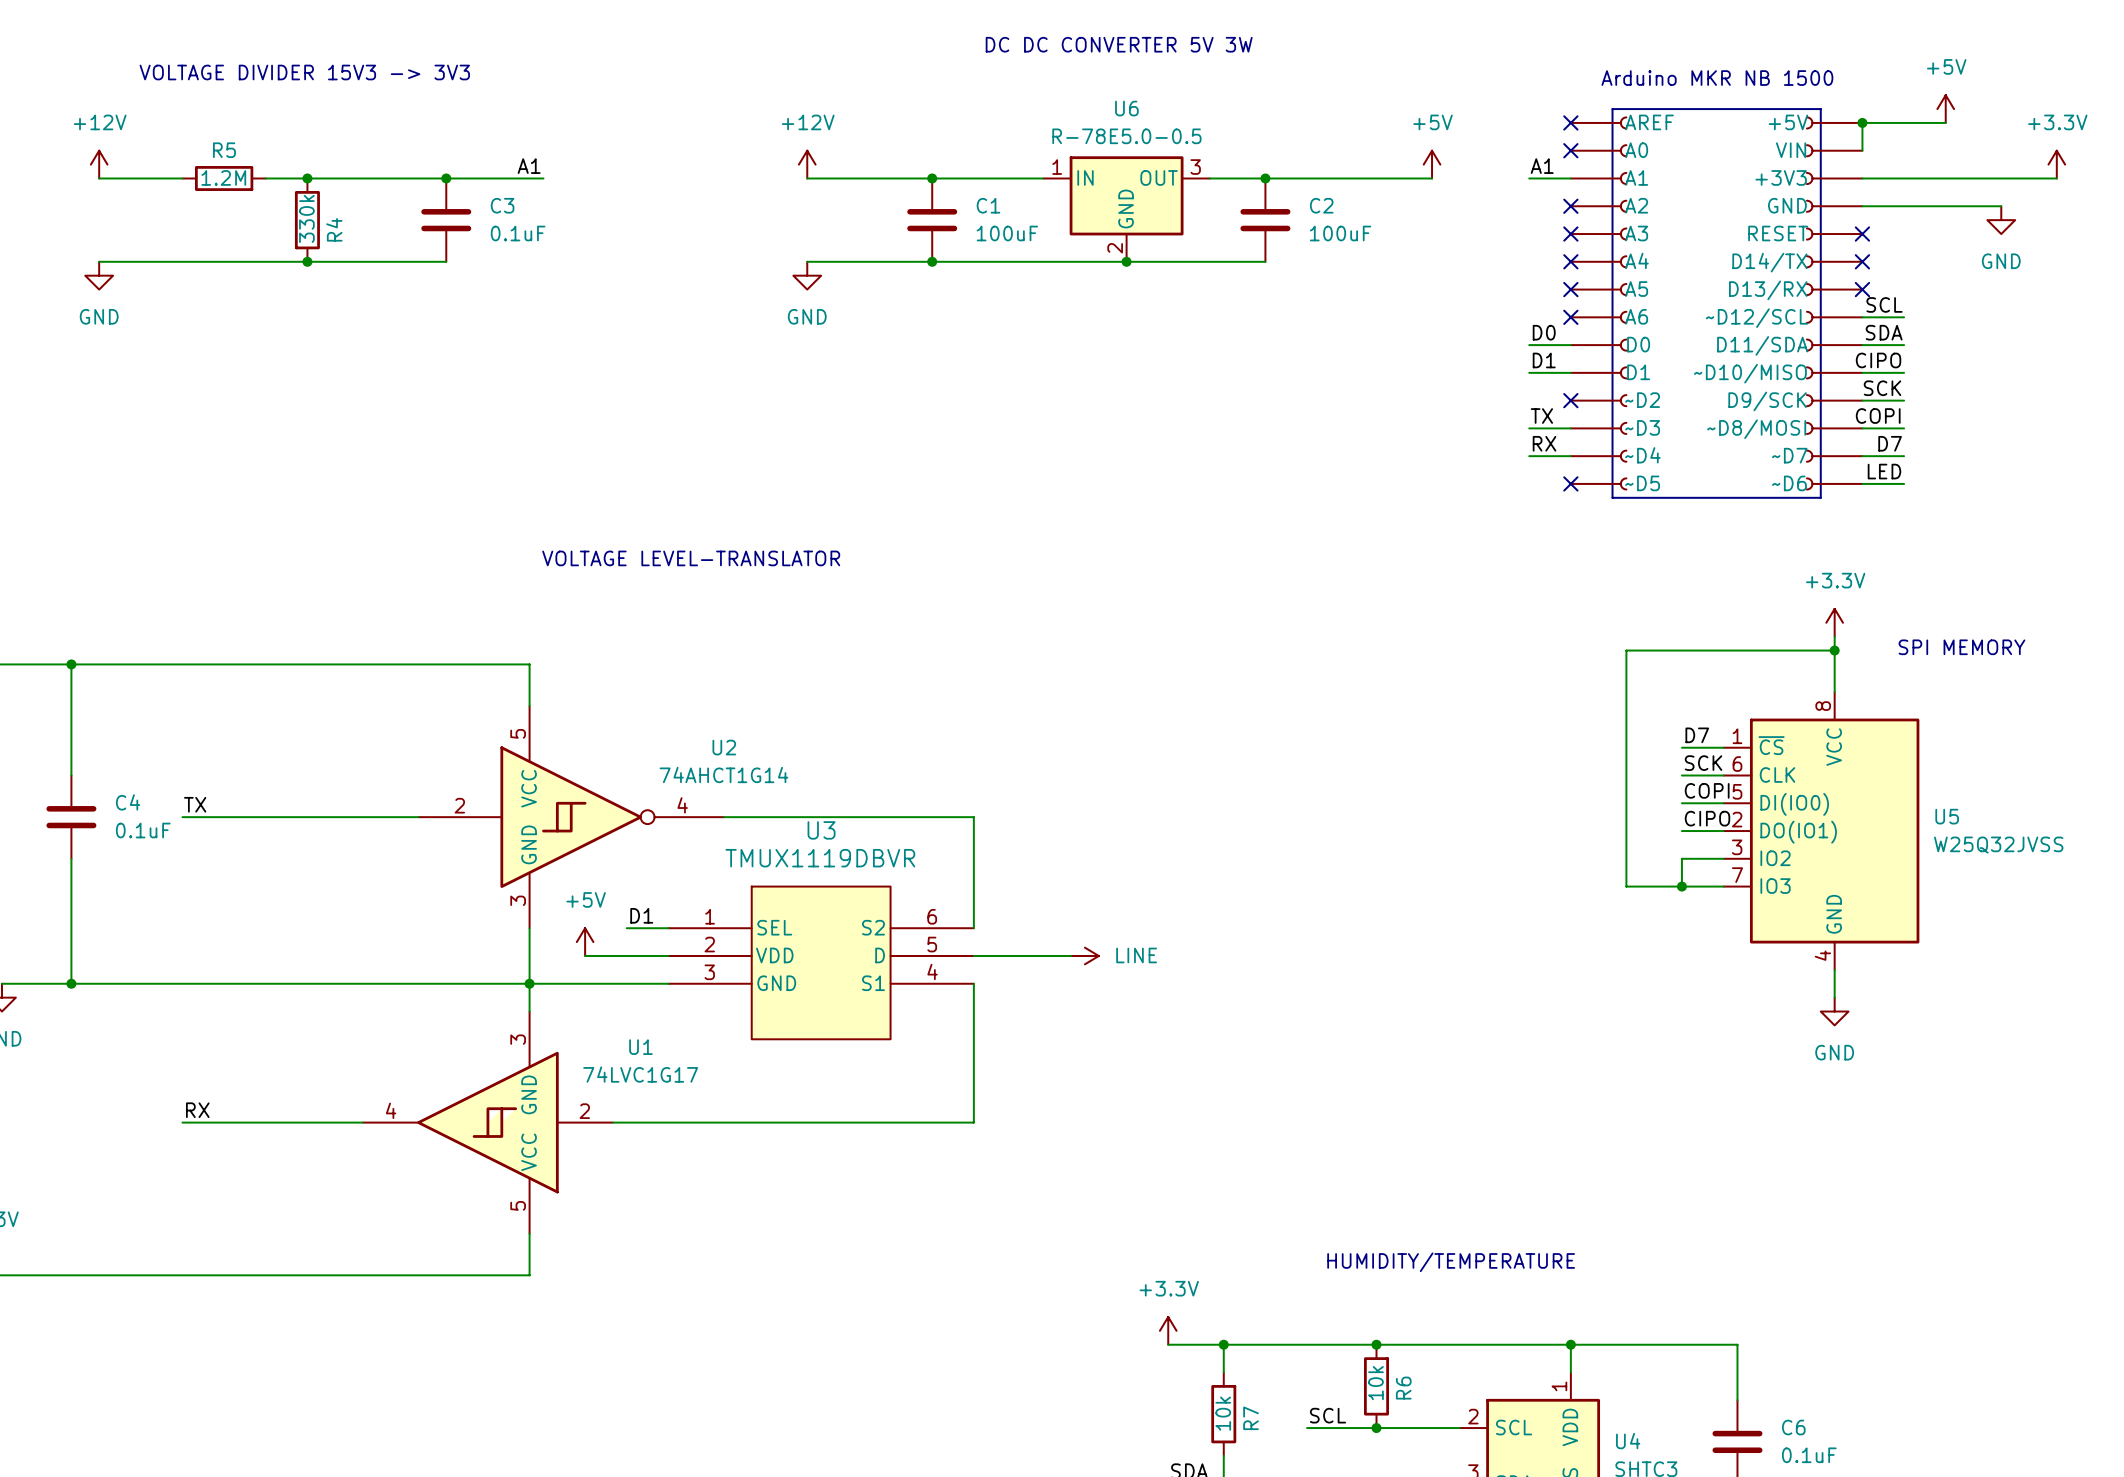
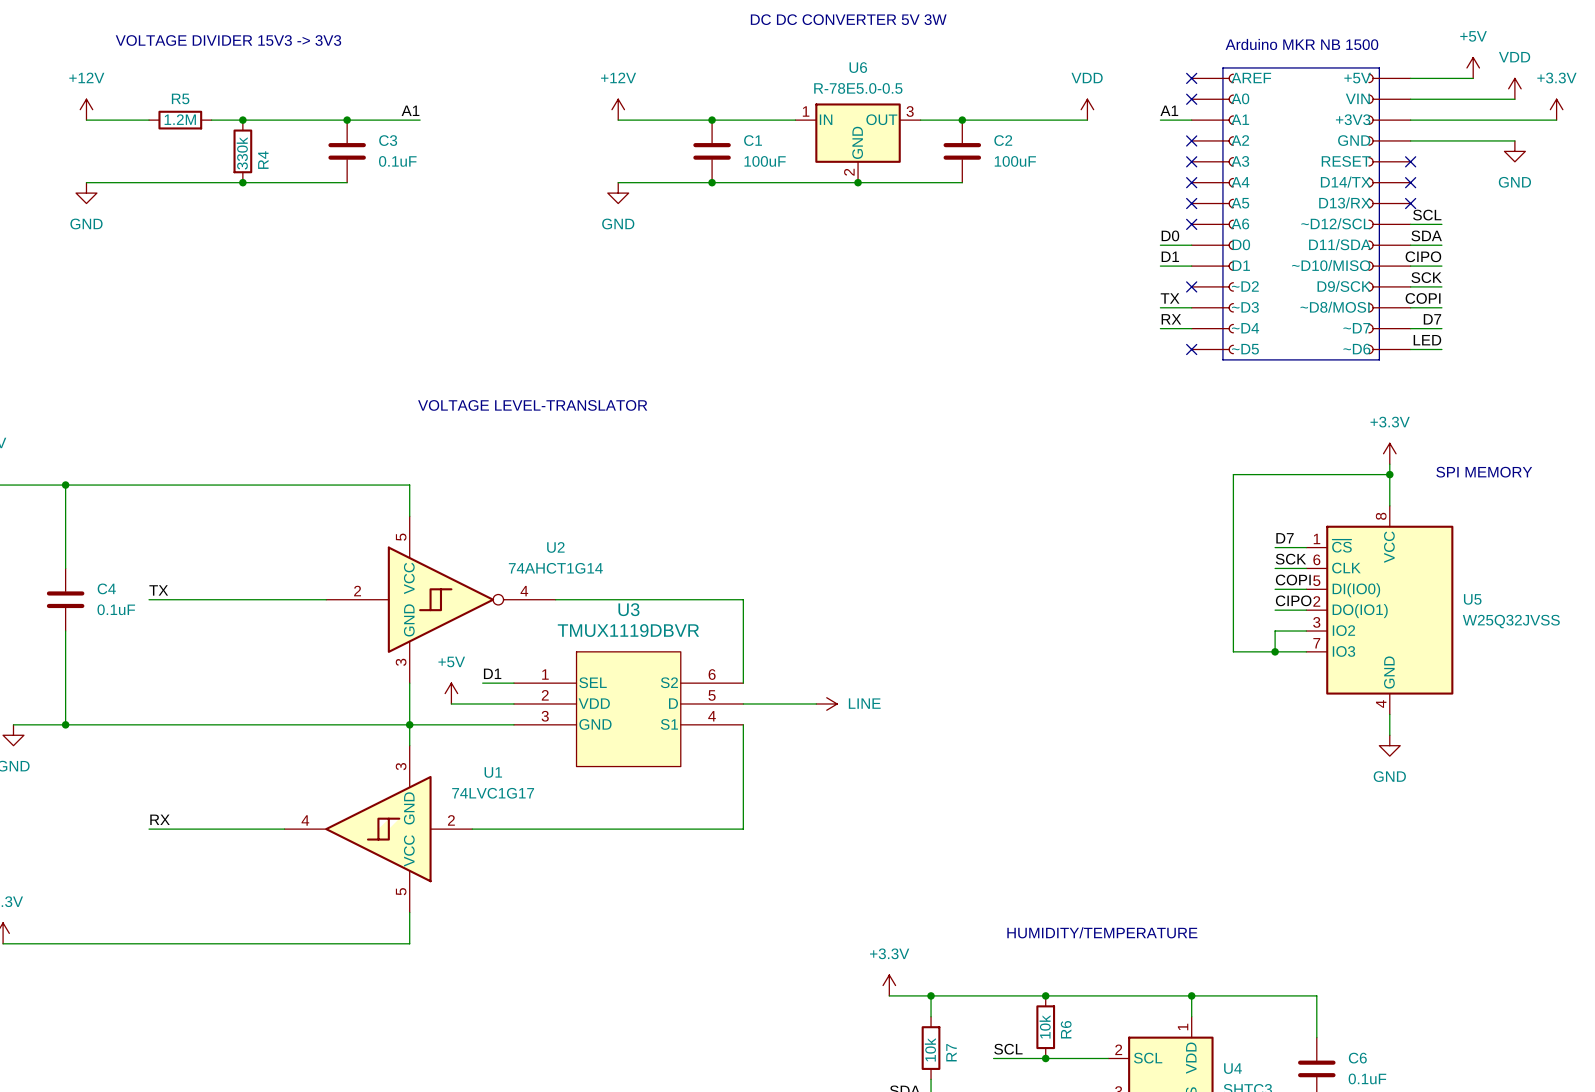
wire: (1862, 122) (1862, 150) -> (1514, 99) (1410, 99)
junction: (1862, 122) -> none
power symbol: none -> VDD (1514, 88)
power symbol: +5V (1432, 164) -> VDD (1087, 109)

